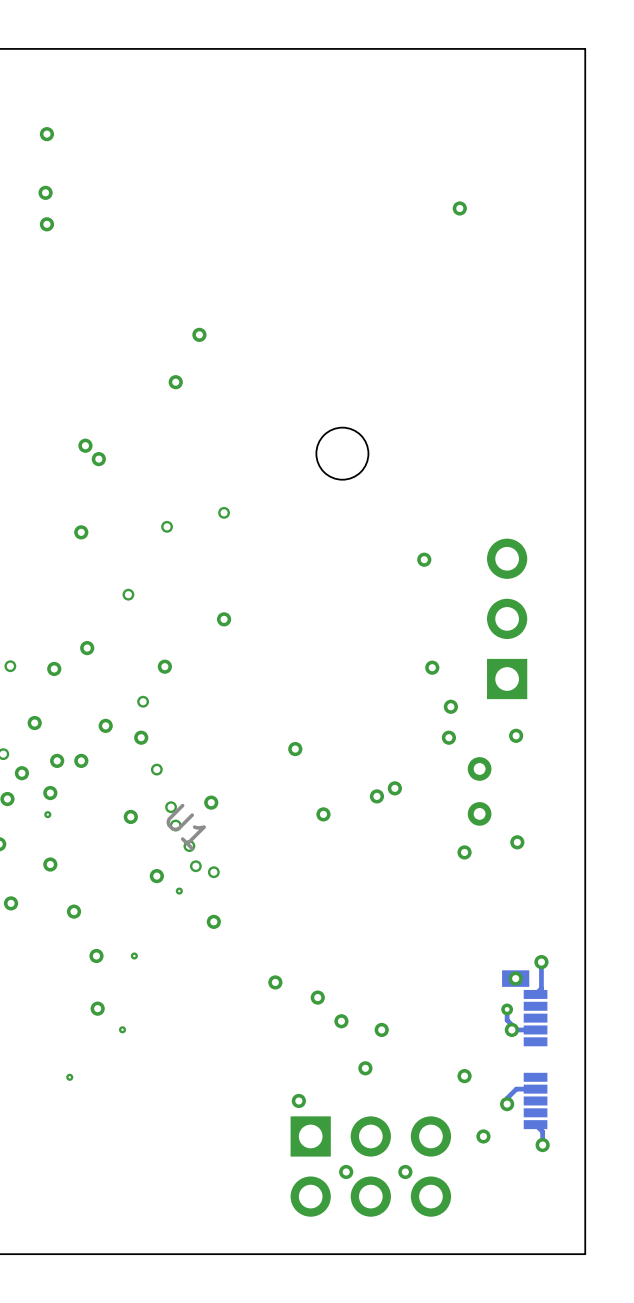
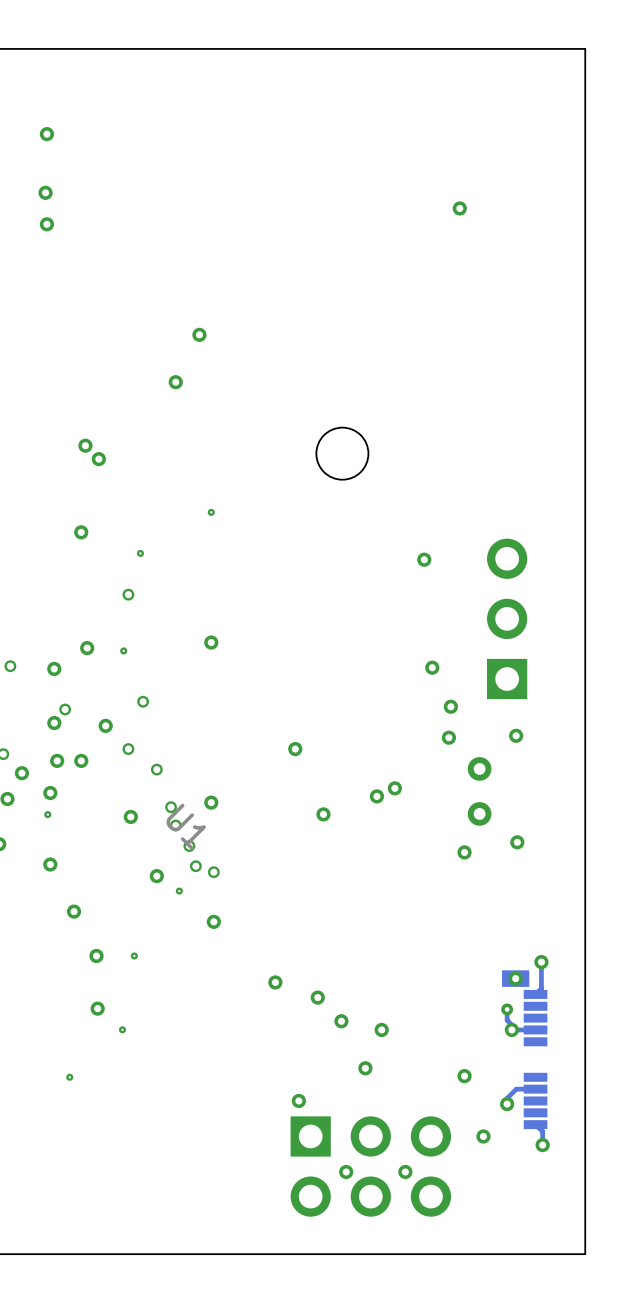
via: none -> (211, 512)
via: (224, 512) -> none
via: (167, 526) -> none
via: none -> (140, 553)
via: (224, 619) -> none
via: none -> (211, 642)
via: none -> (123, 650)
via: (164, 666) -> none
via: none -> (65, 709)
via position: (34, 723) -> (54, 723)
via position: (141, 737) -> (128, 749)
via: (11, 903) -> none

